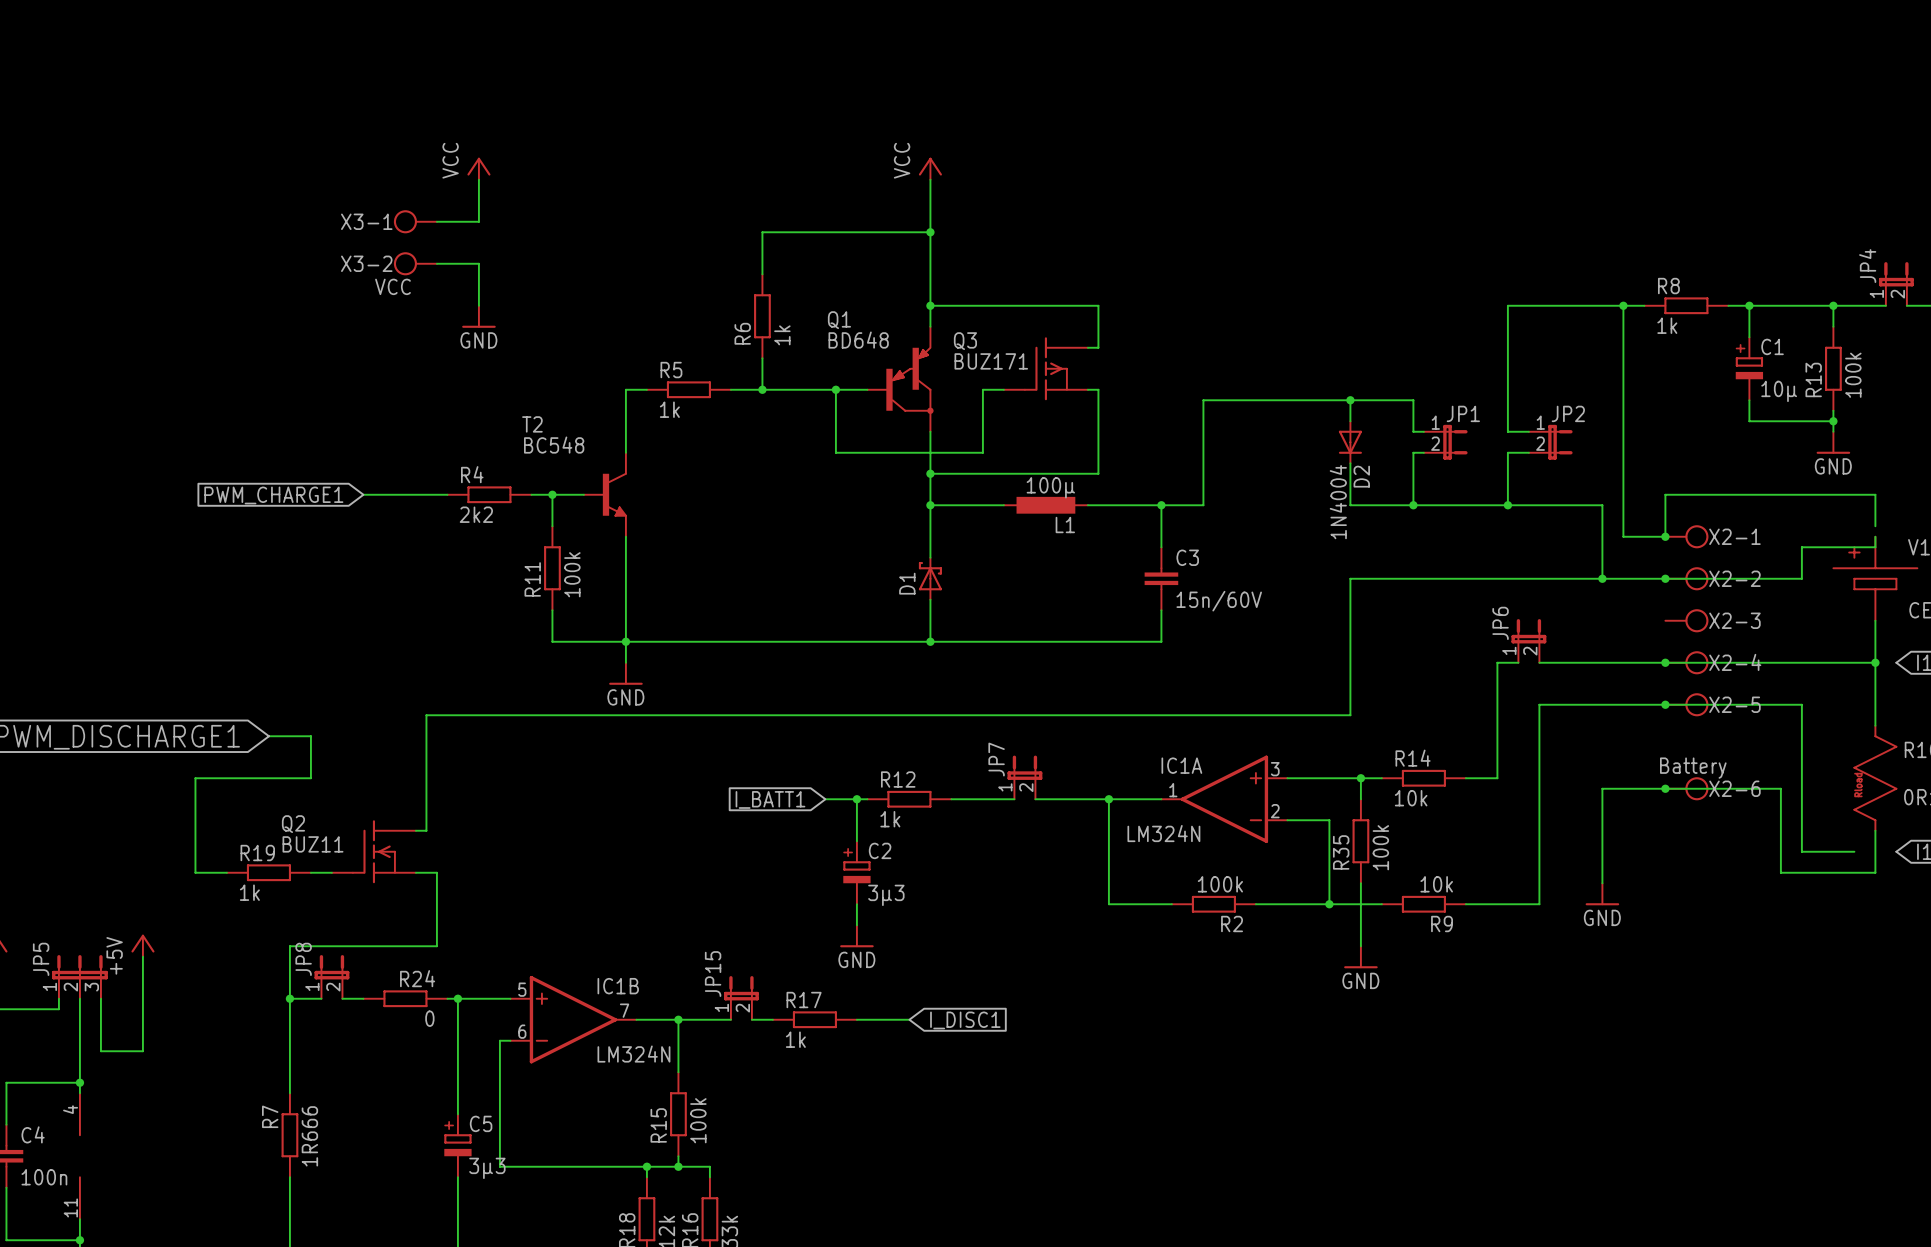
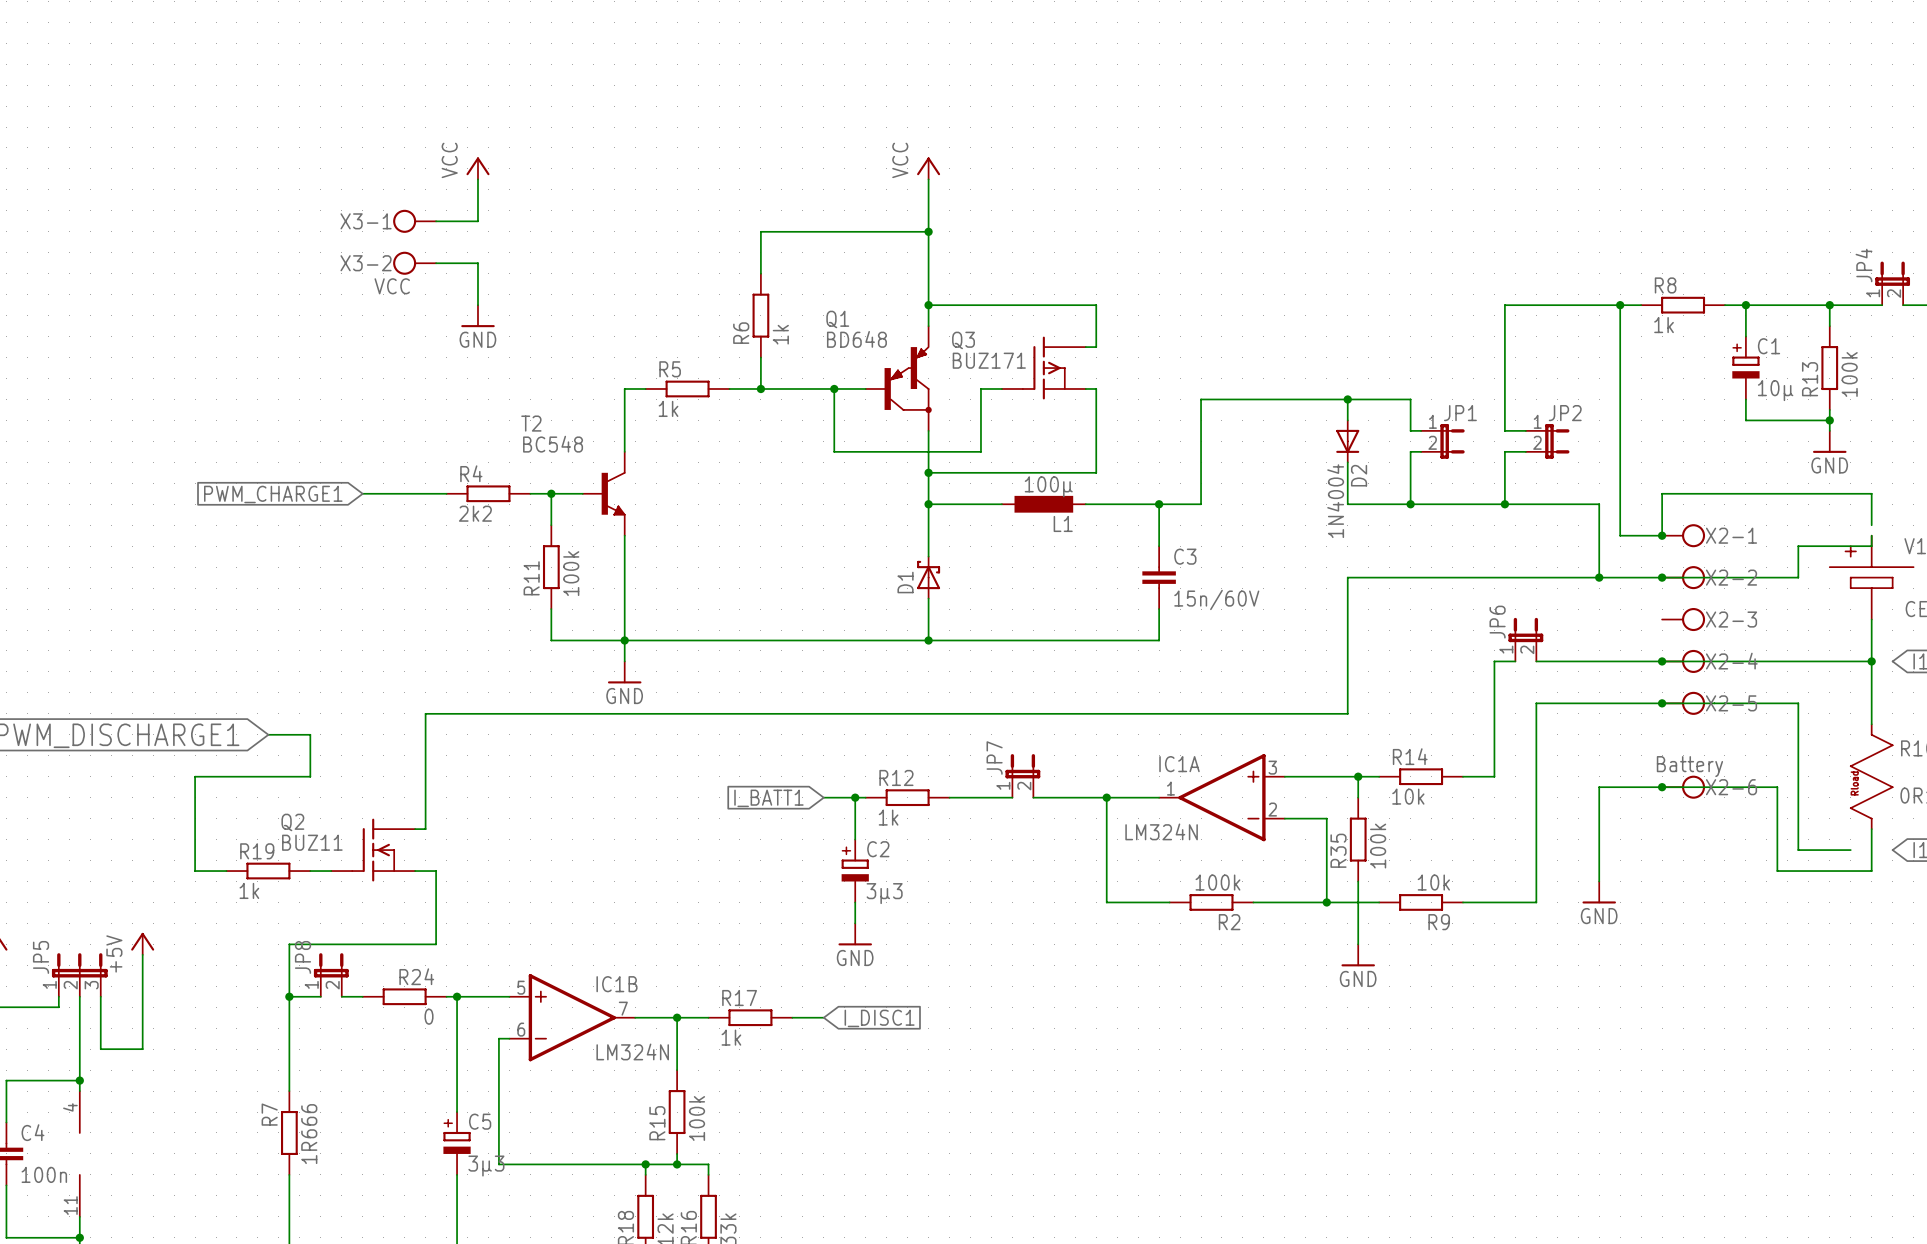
JP15: (741, 997) -> none
wire: (751, 1019) (772, 1019) -> none
wire: none -> (792, 1017) (823, 1017)
R17 position: (814, 1019) -> (750, 1017)
wire: (856, 1019) (909, 1019) -> none
global label position: I_DISC1 (965, 1020) -> I_DISC1 (879, 1018)

